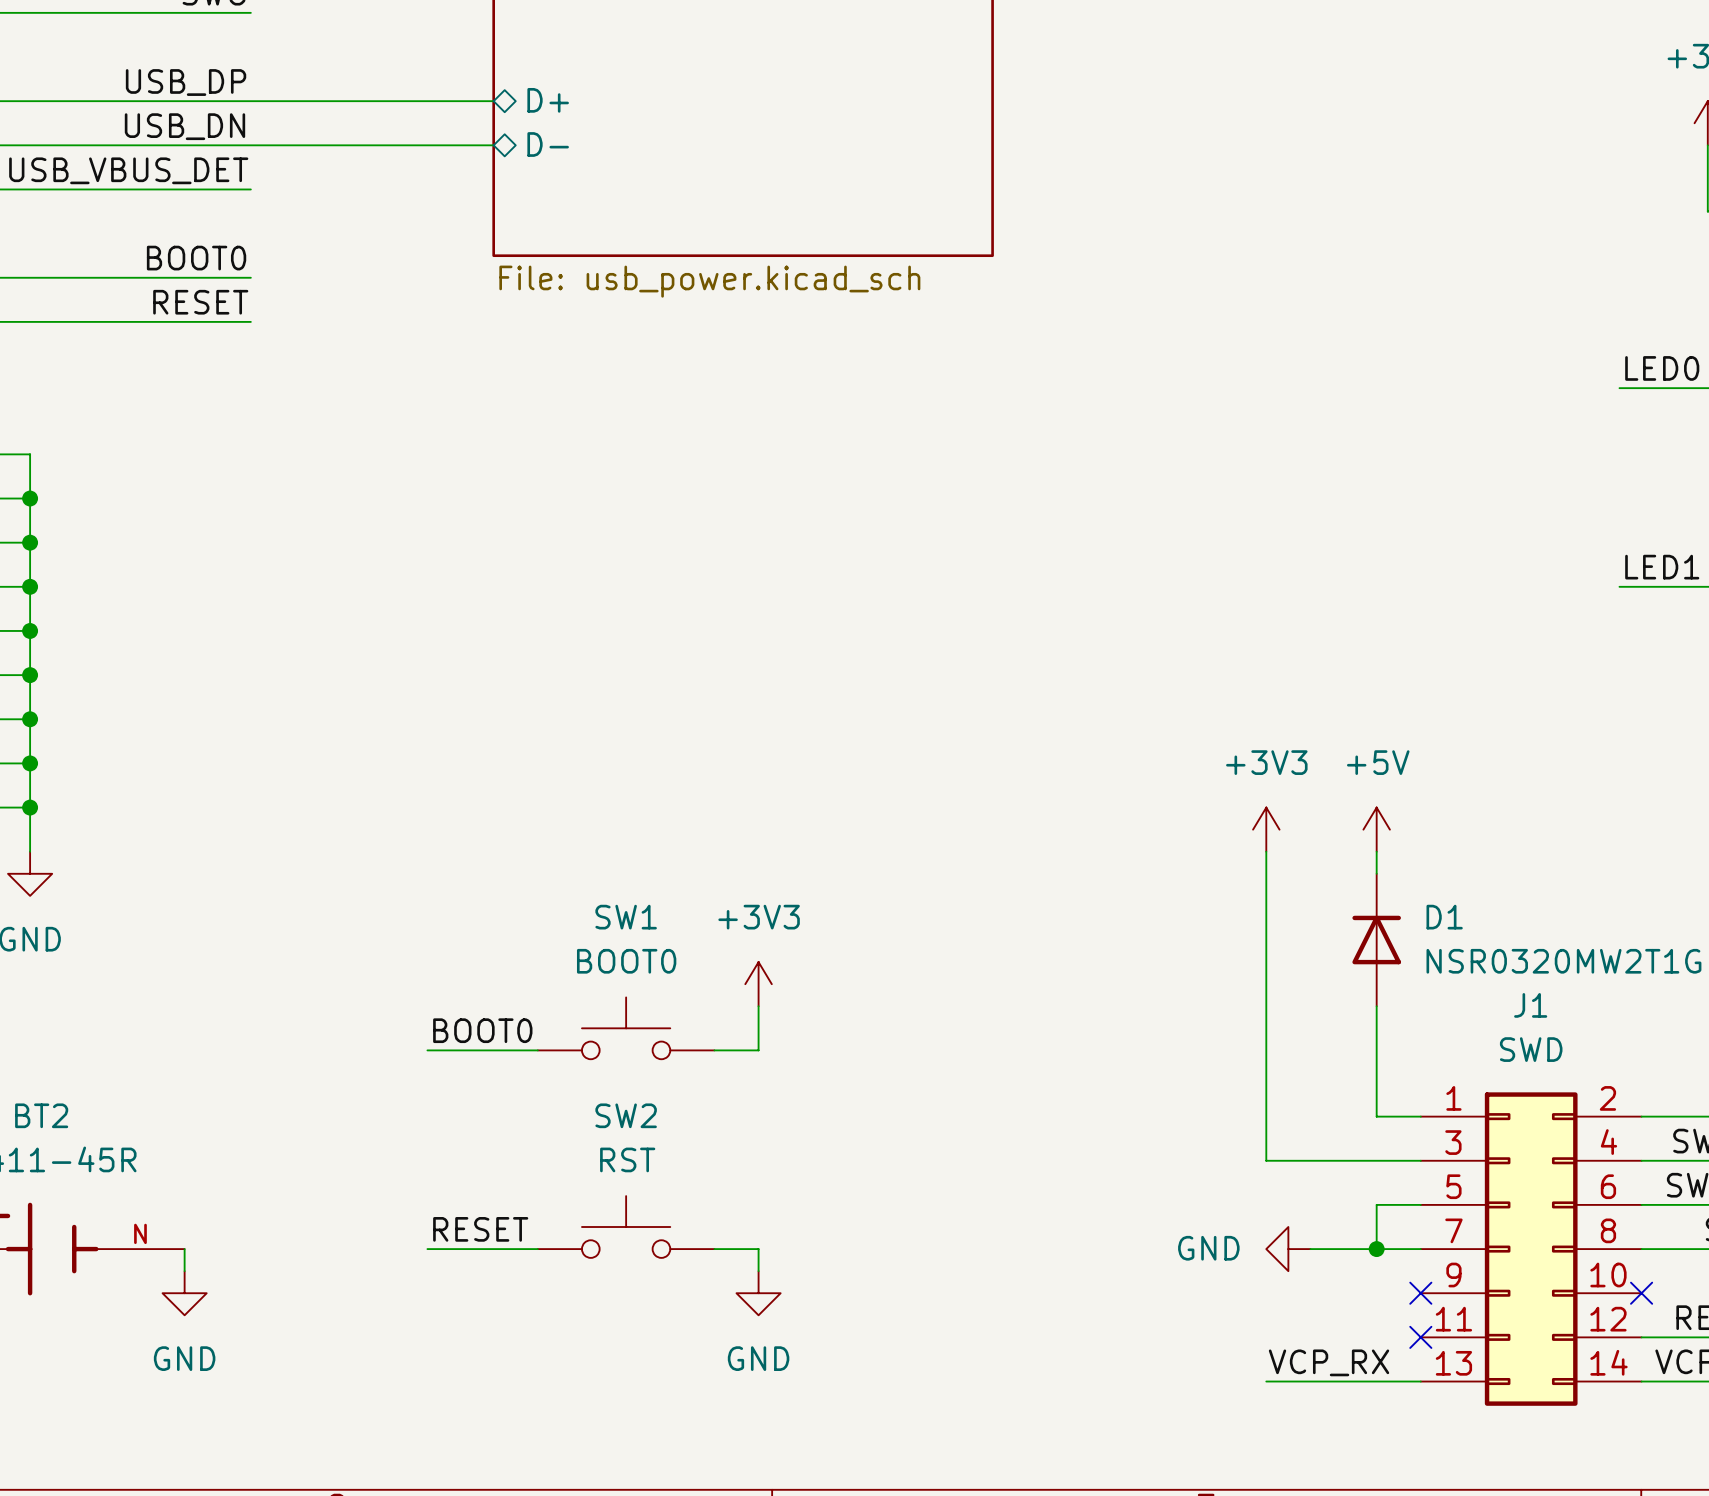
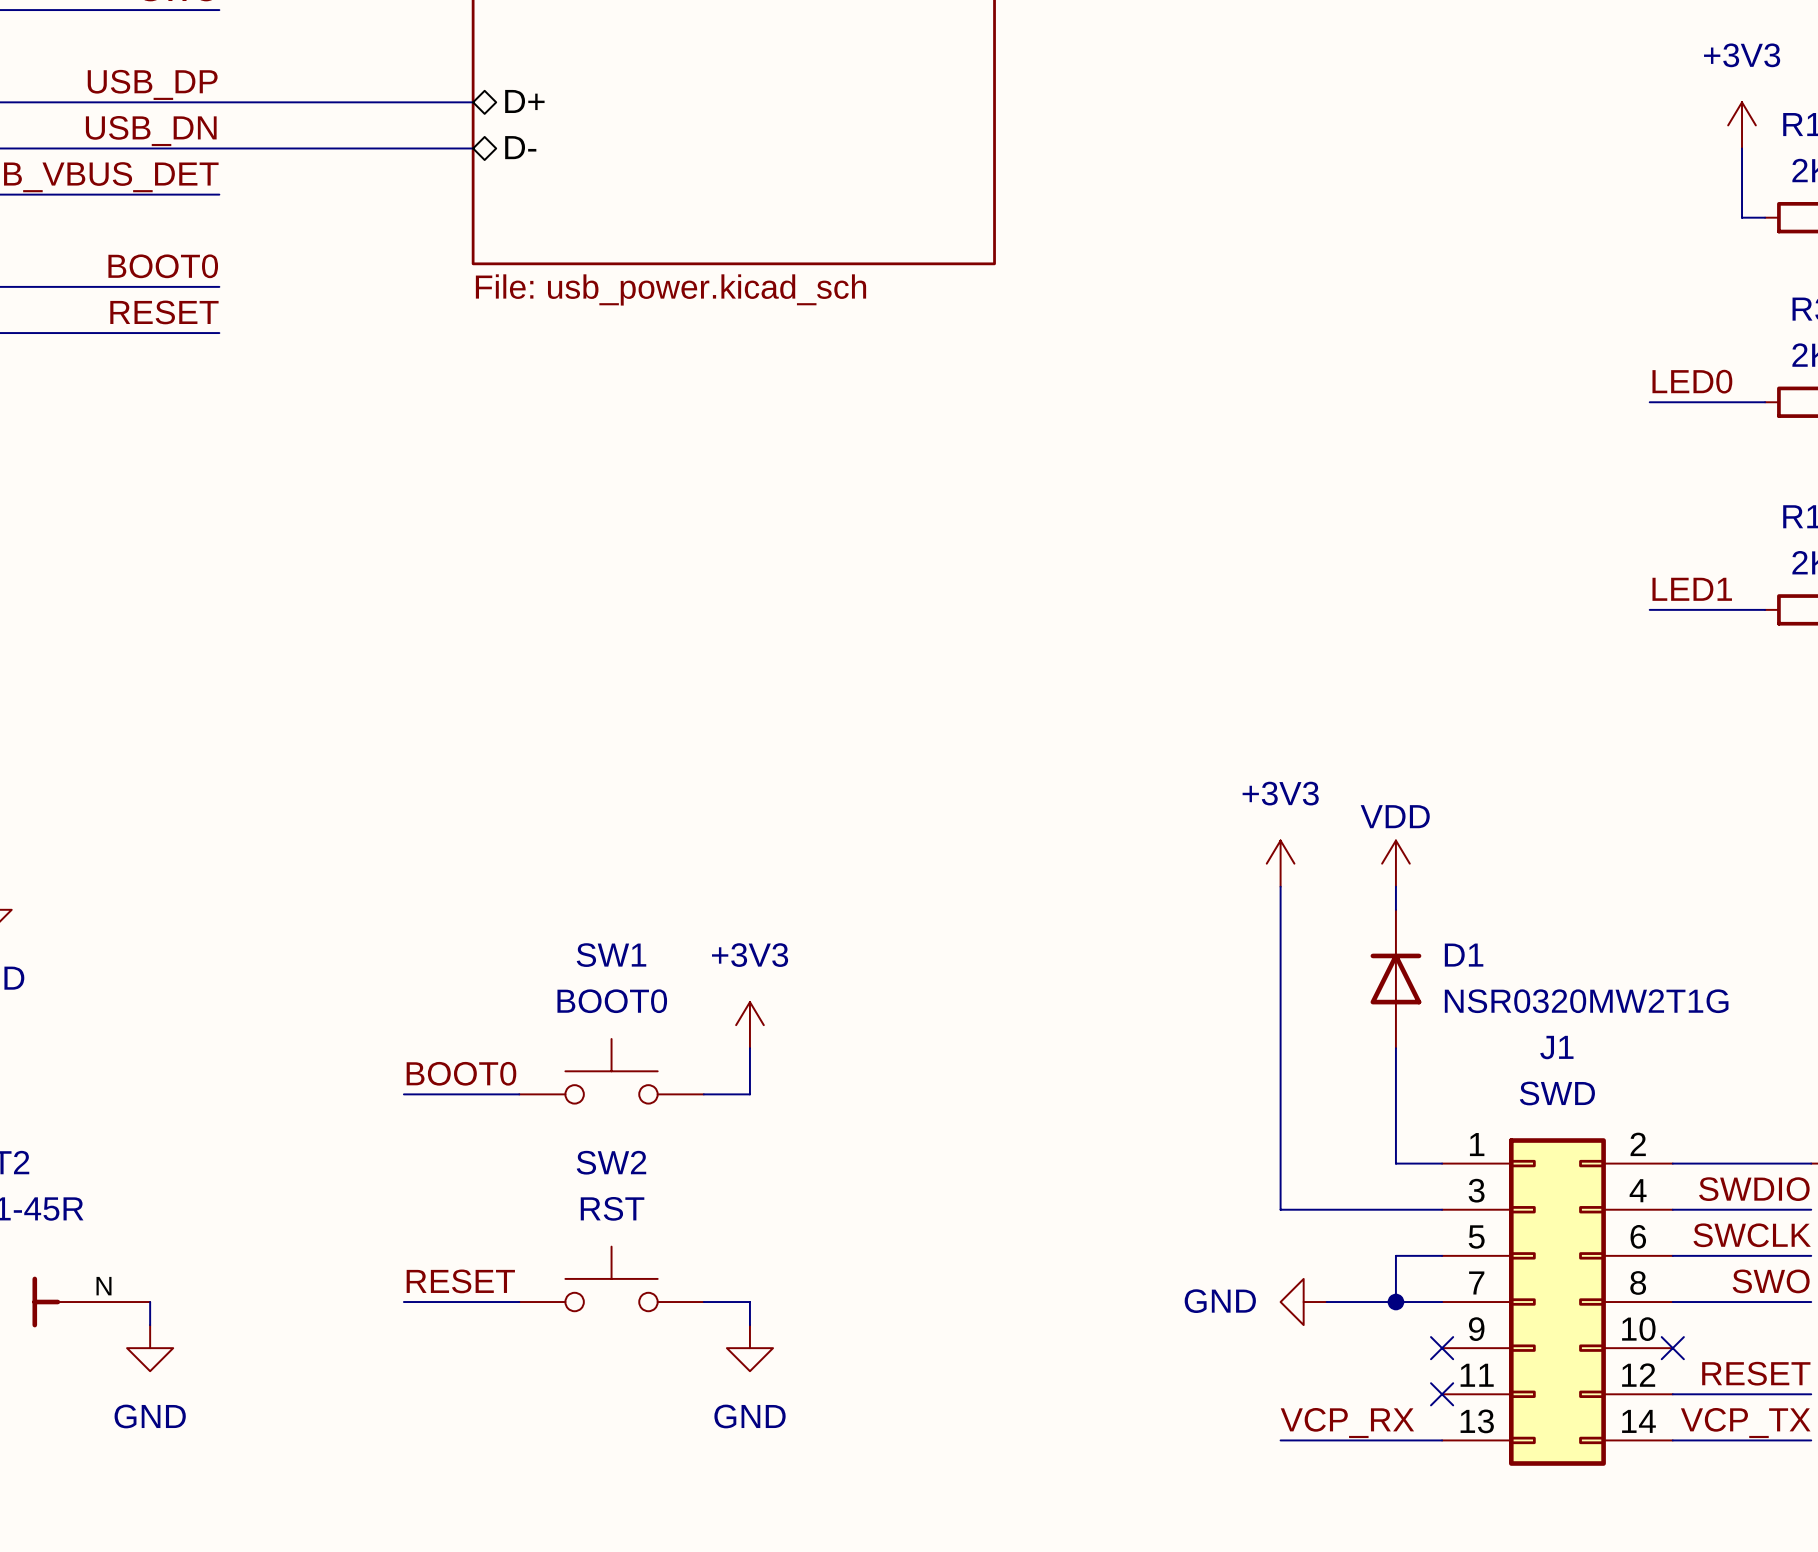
power symbol: +5V (1376, 829) -> VDD (1395, 863)

